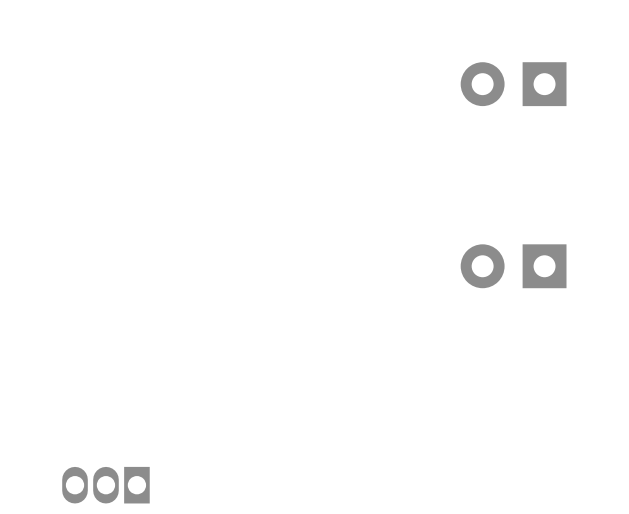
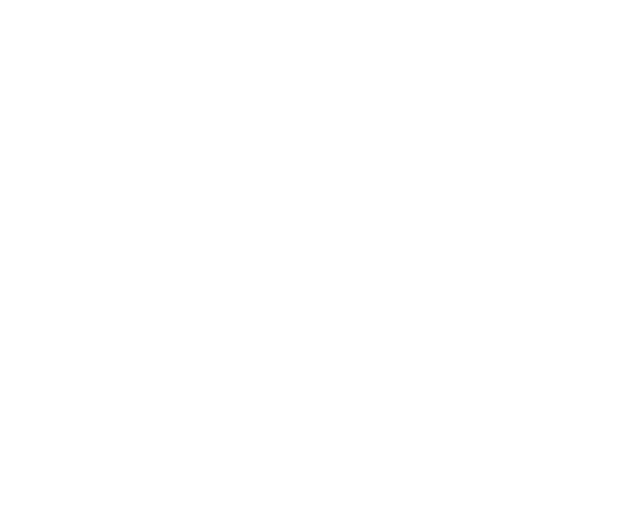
part: (513, 84) -> none
part: (513, 266) -> none
part: (105, 485) -> none

